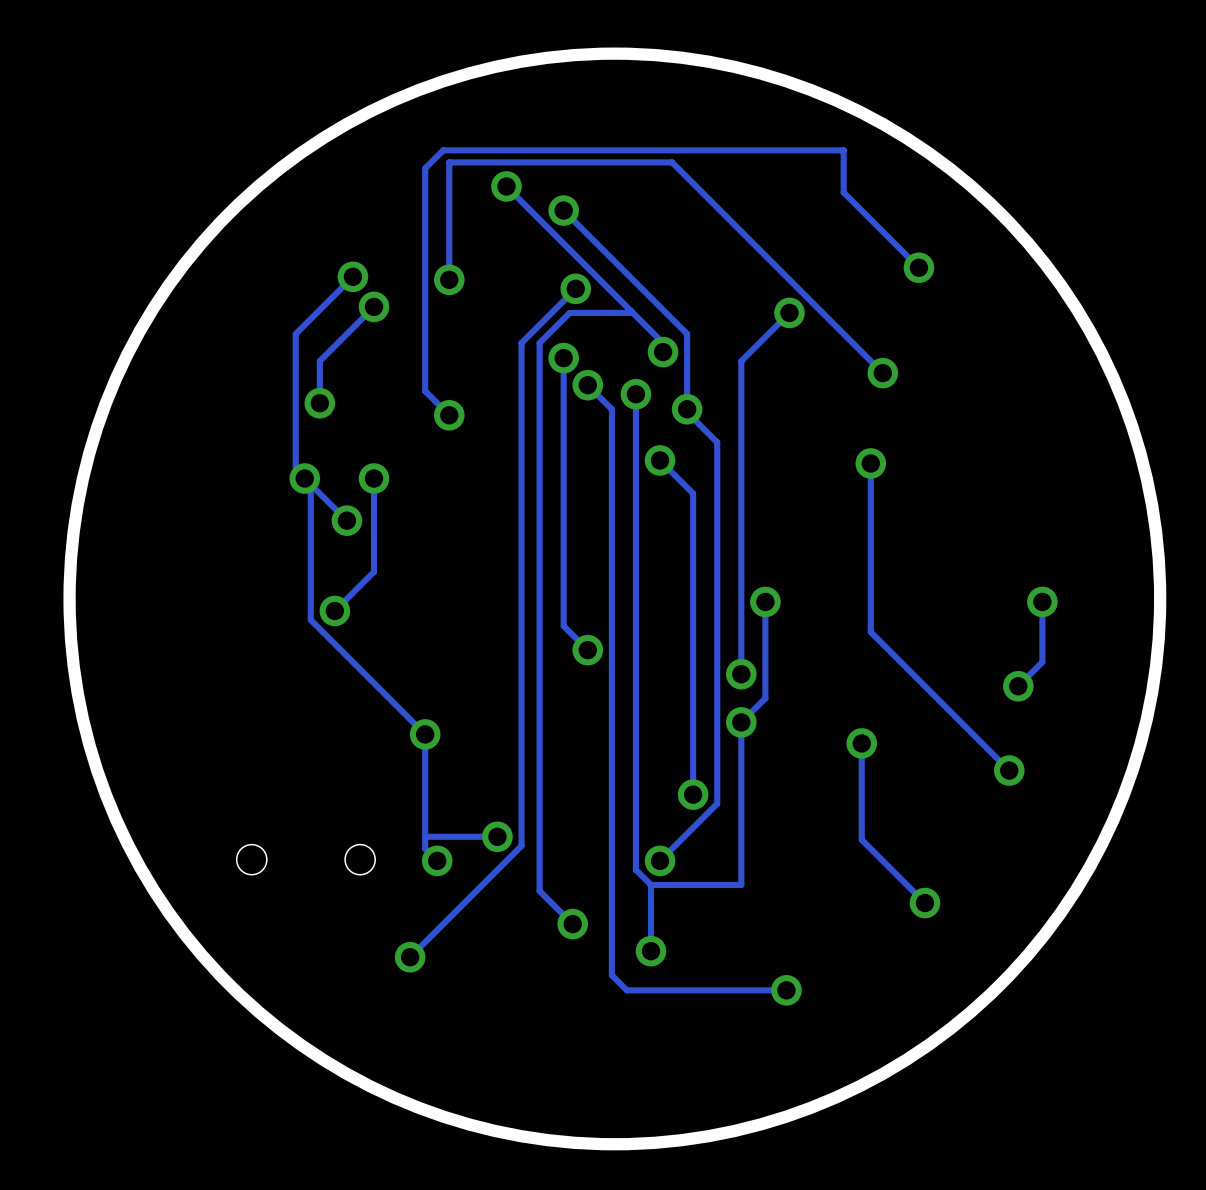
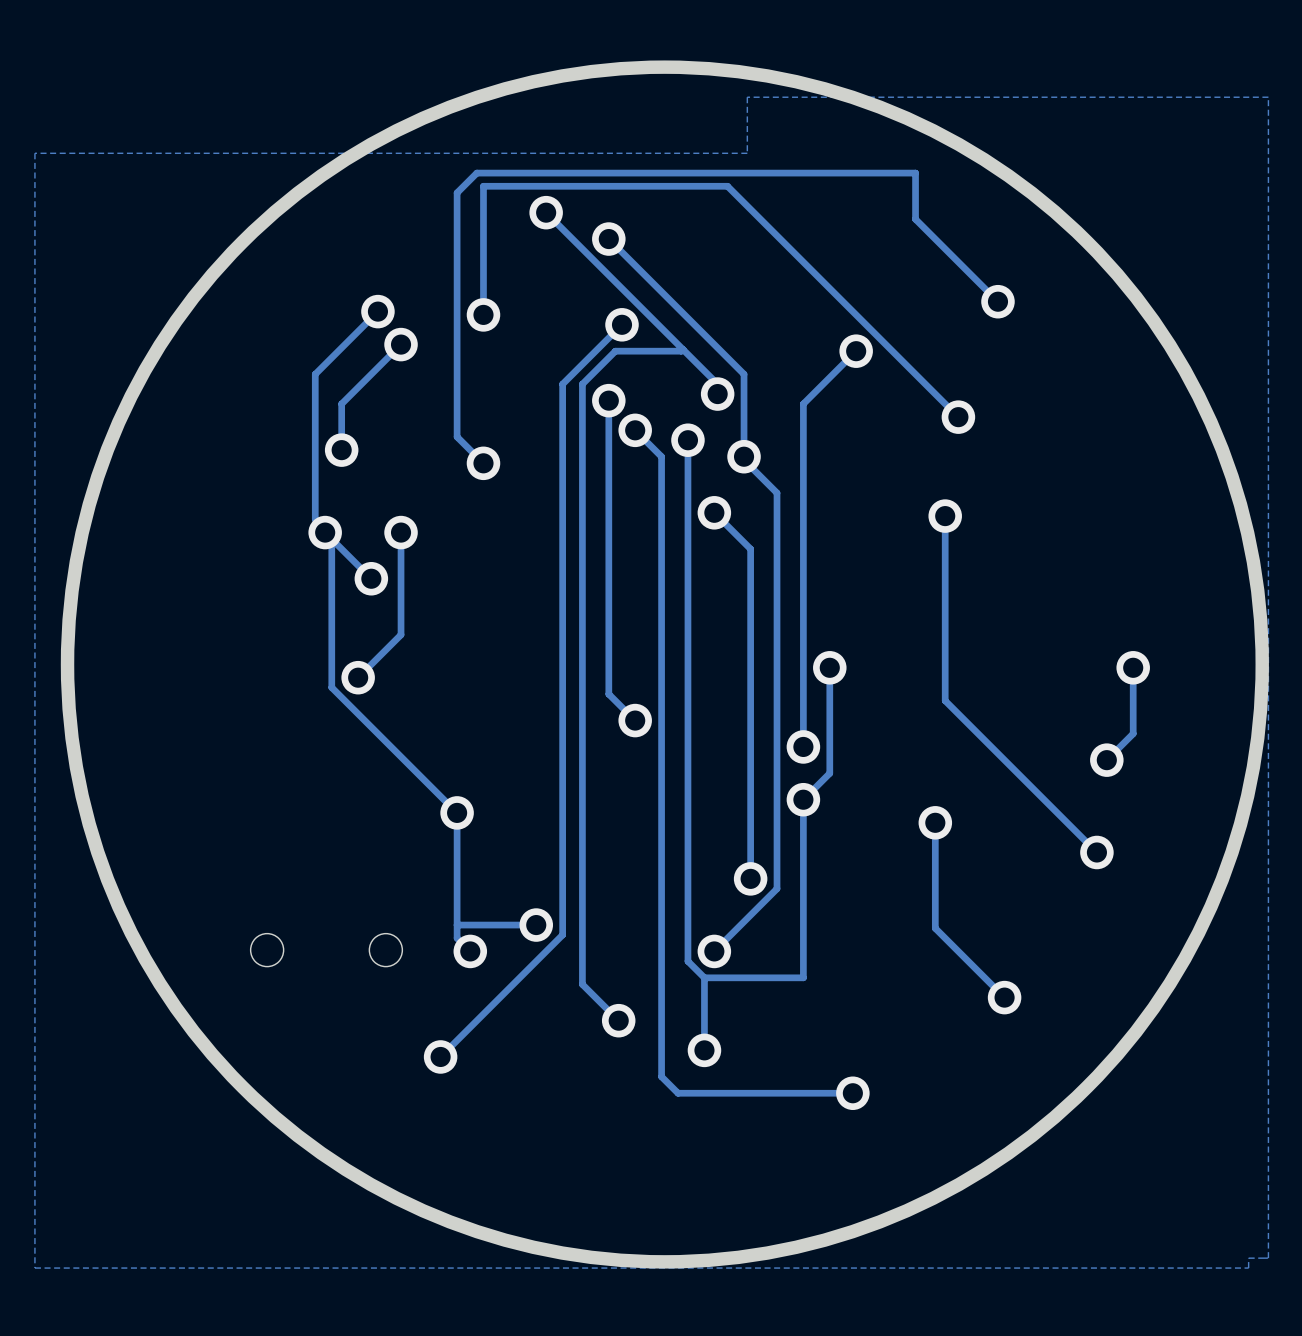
zone outline: none -> (1268, 97) (1268, 1258) (1248, 1258) (1248, 1268) (34, 1268) (34, 153) (747, 153) (747, 97) (1268, 97)

